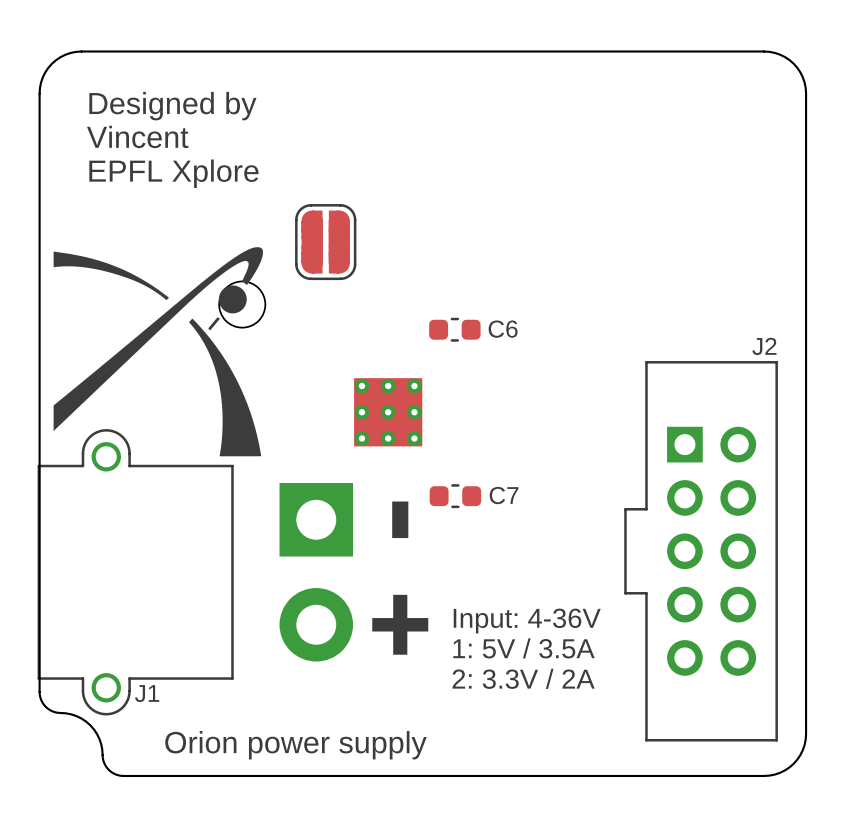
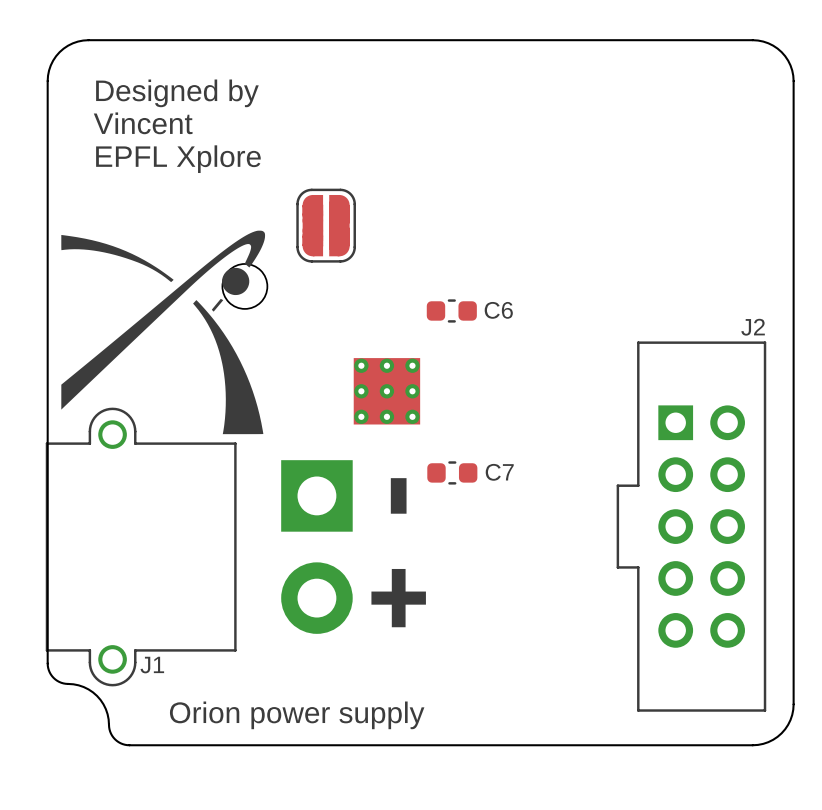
text: Input: 4-36V (527, 621) -> none
text: 1: 5V / 3.5A (523, 648) -> none
text: 2: 3.3V / 2A (523, 678) -> none

